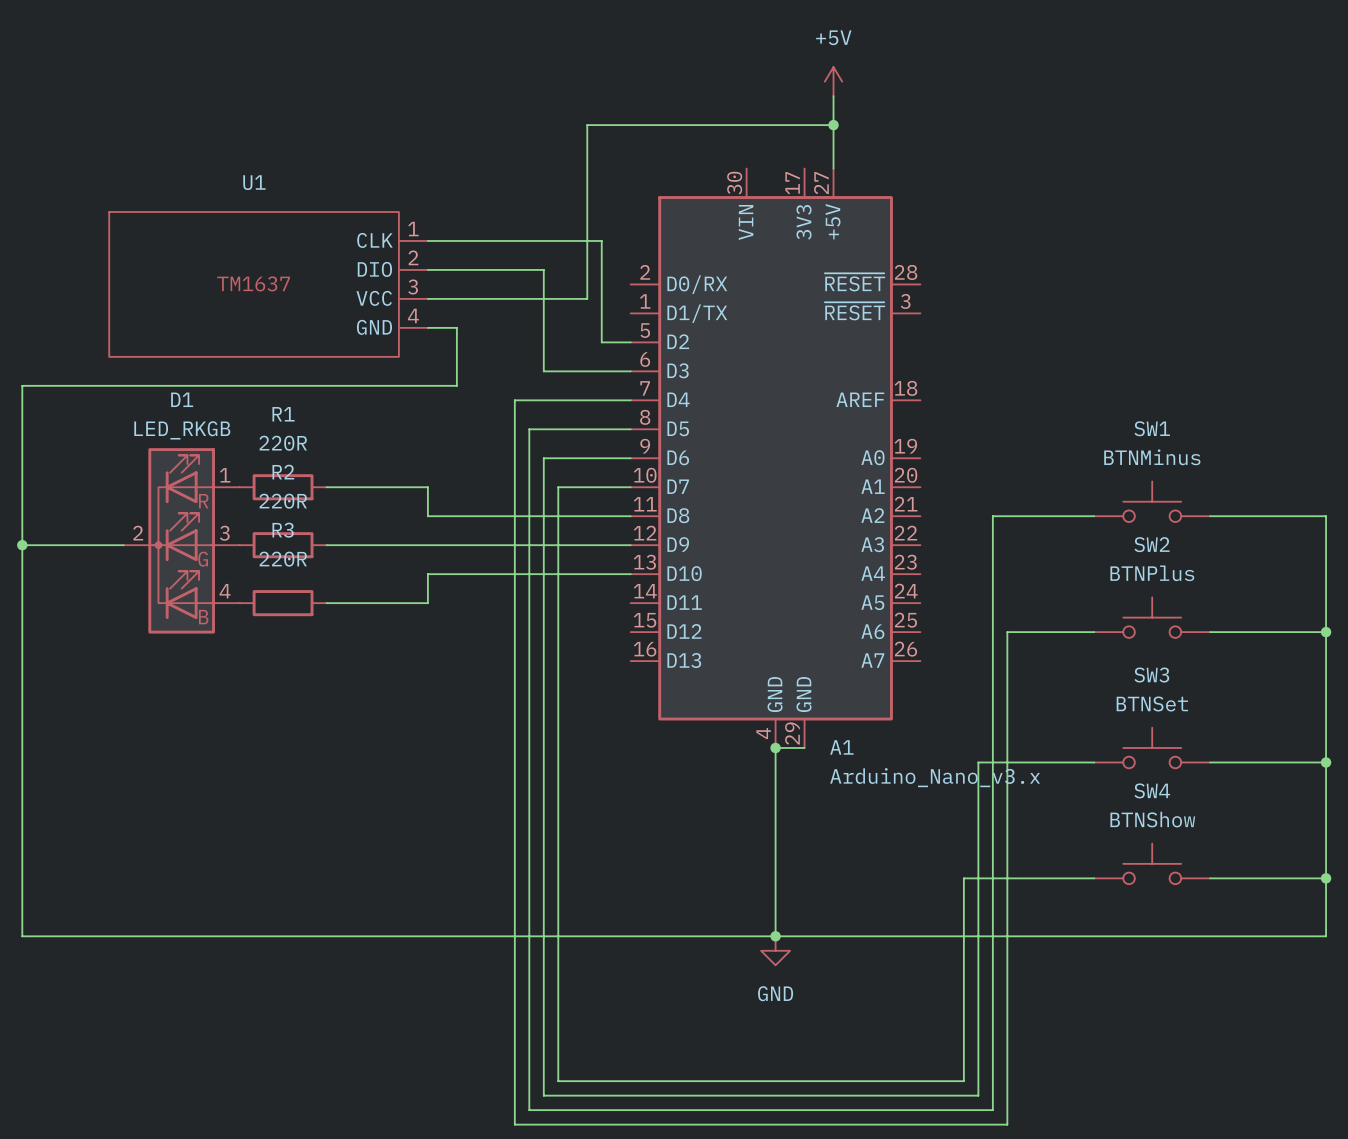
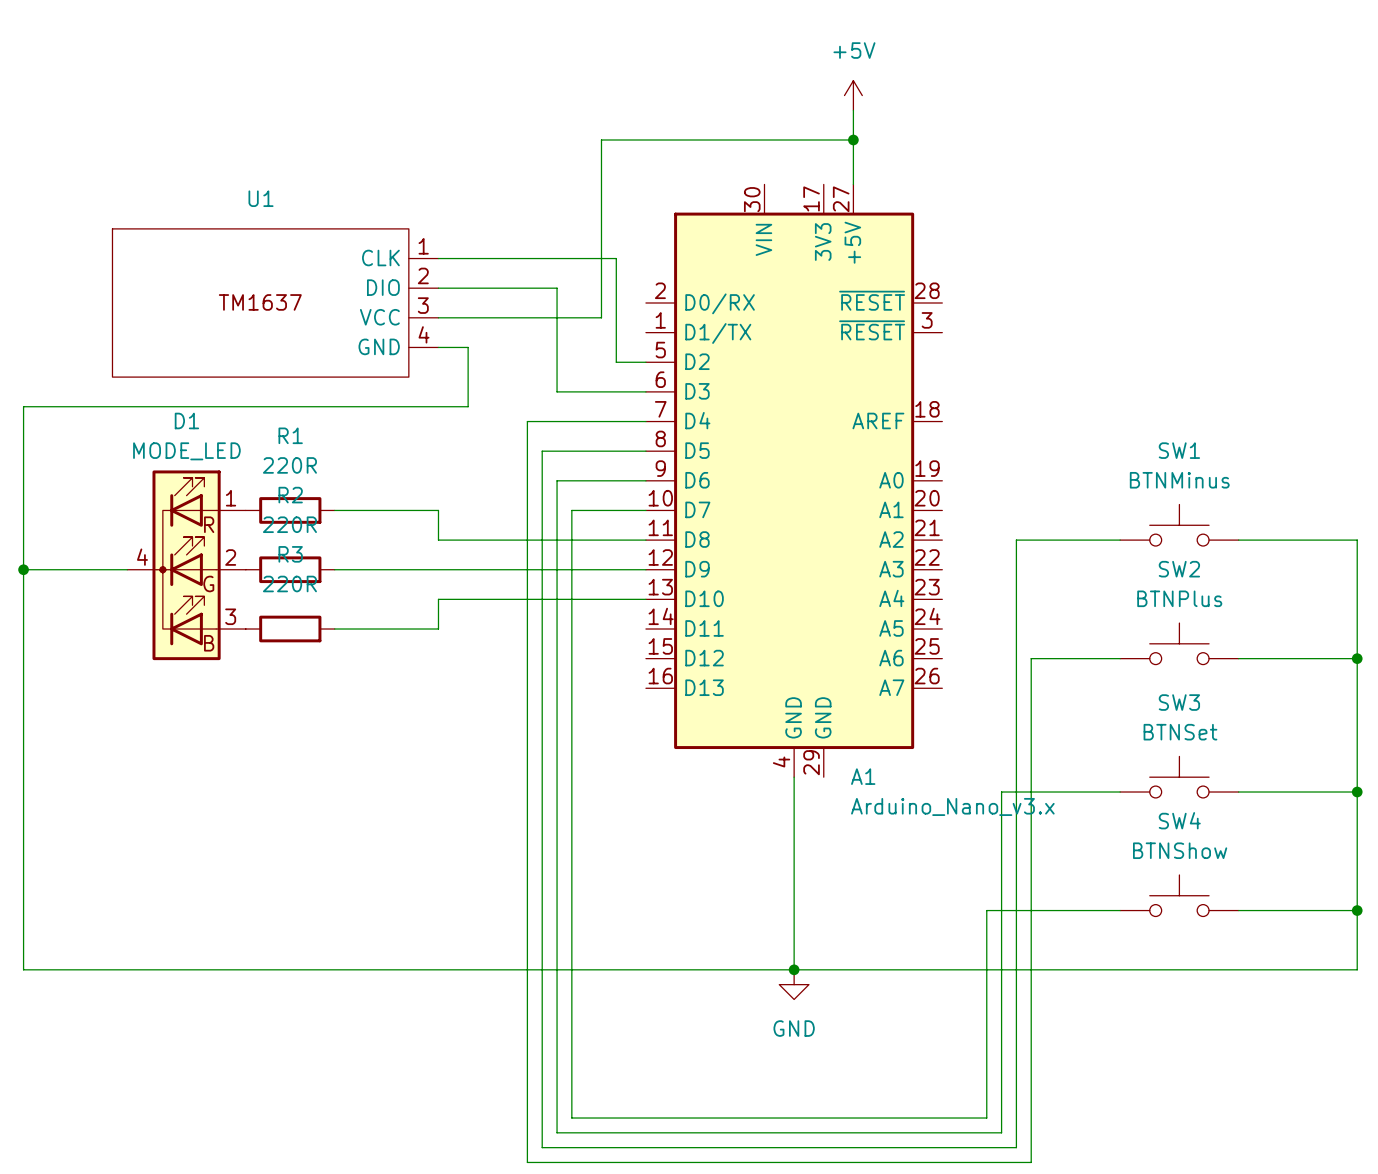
D1 value: LED_RKGB (182, 430) -> MODE_LED (186, 451)
D1 pin number: 2 (138, 533) -> 4 (142, 557)
D1 pin number: 3 (224, 533) -> 2 (230, 557)
D1 pin number: 4 (225, 591) -> 3 (230, 616)
wire: (775, 747) (804, 747) -> none
junction: (775, 747) -> none

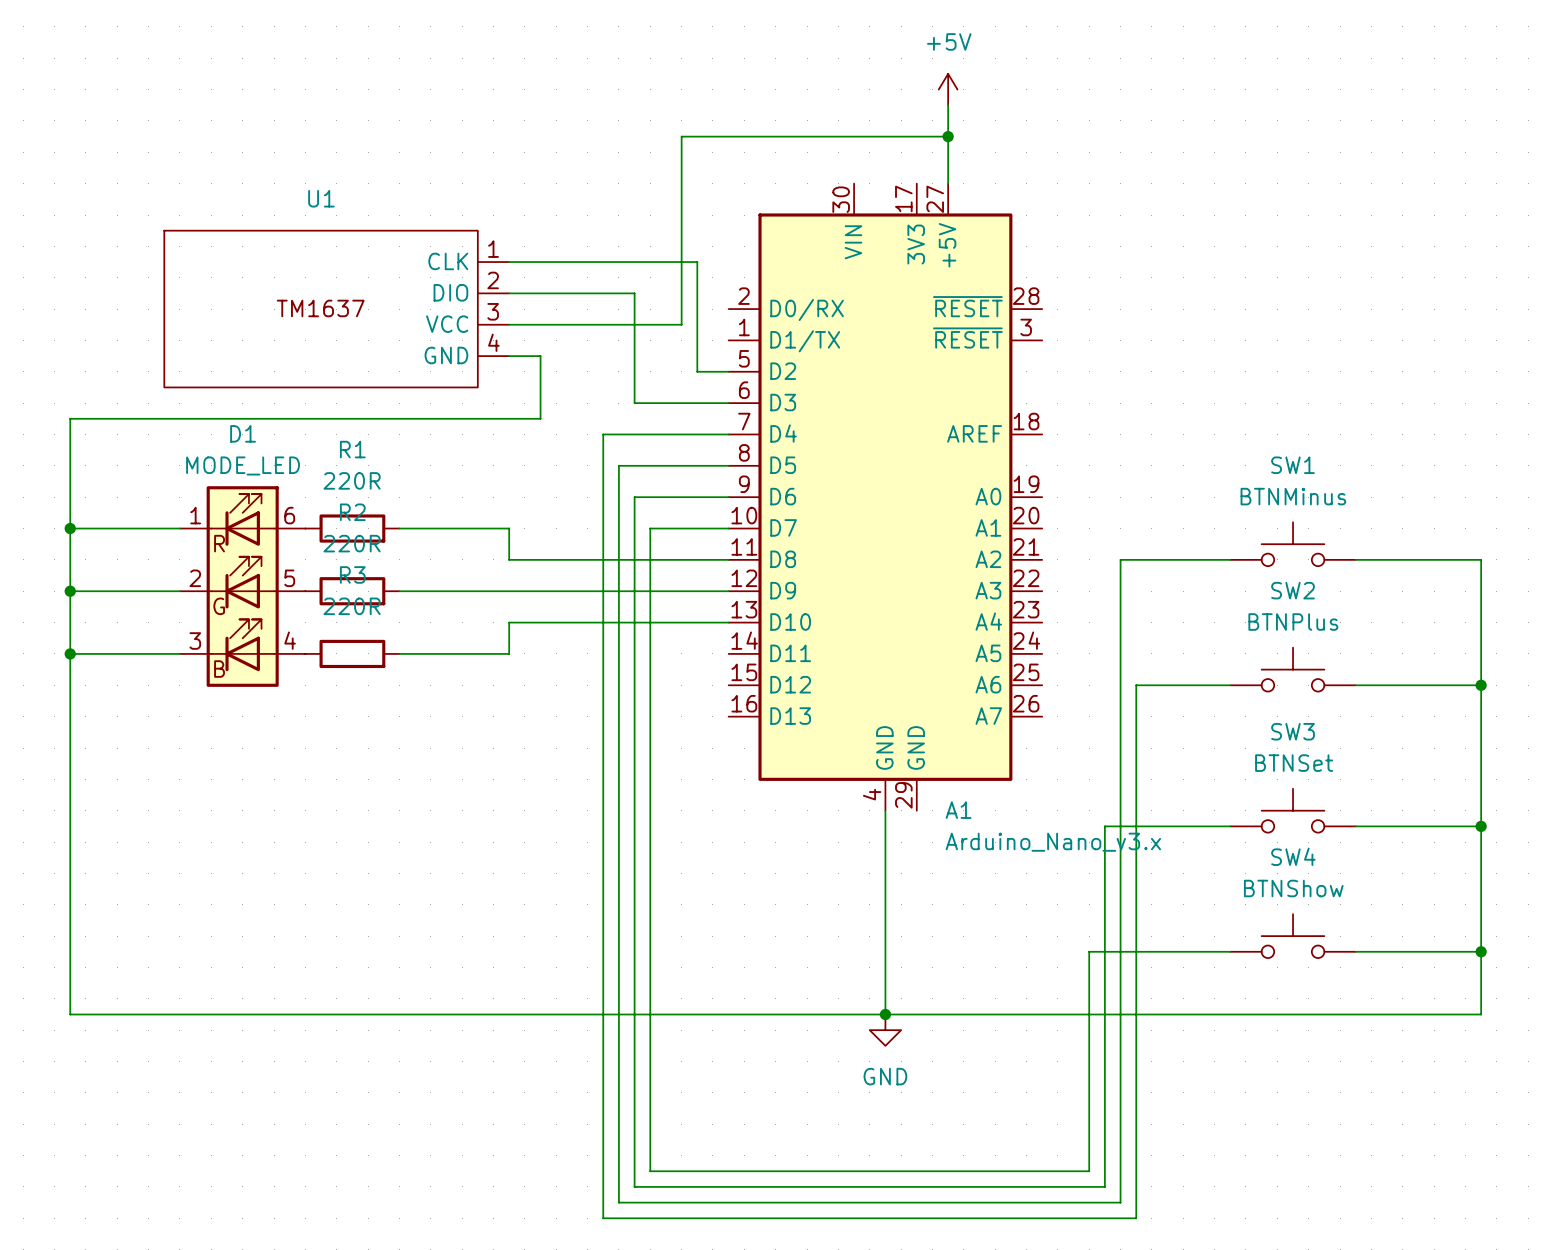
D1 symbol: [127, 470, 246, 661] -> [179, 486, 306, 687]
wire: none -> (70, 528) (179, 528)
junction: none -> (70, 528)
wire: none -> (70, 653) (179, 653)
junction: none -> (70, 653)

